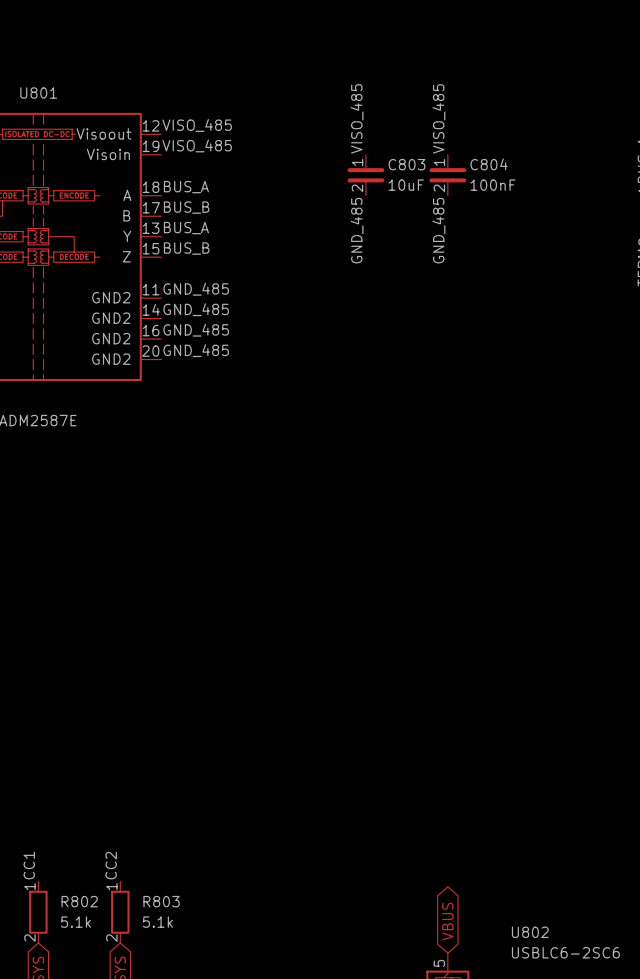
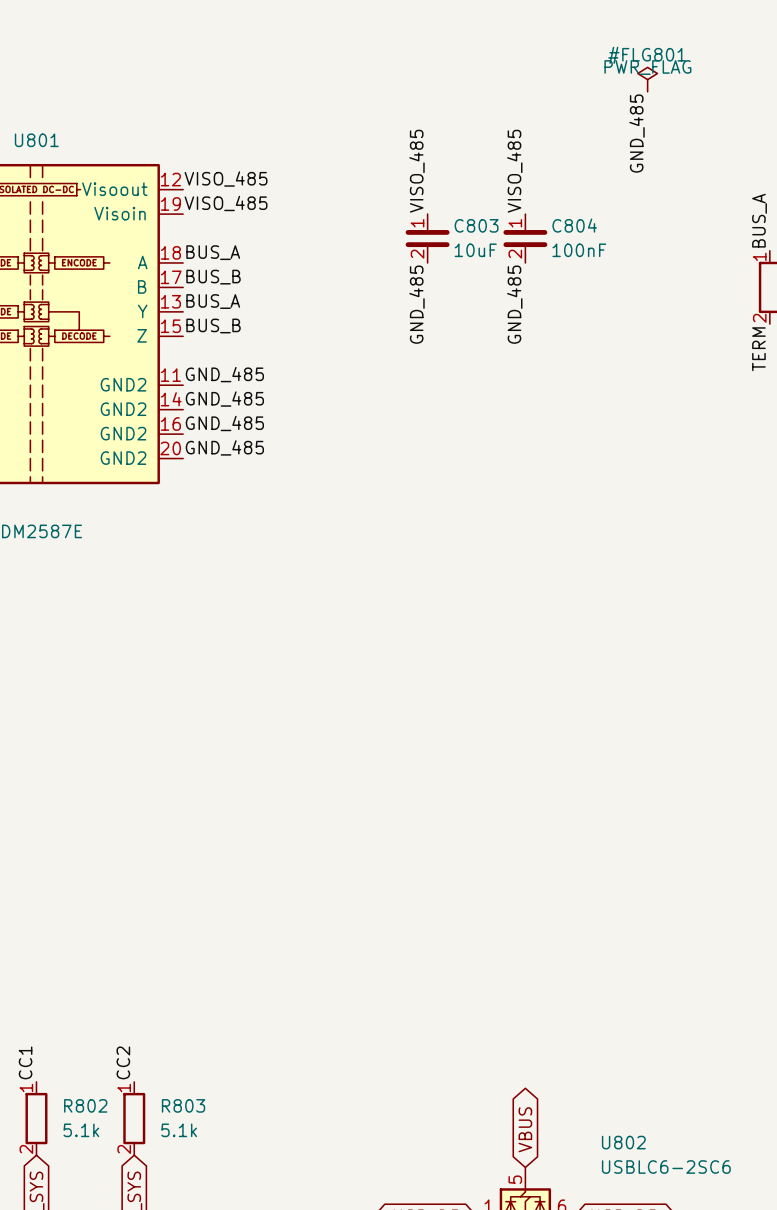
#FLG801: none -> PWR_FLAG (647, 79)
label: none -> GND_485 (637, 133)

